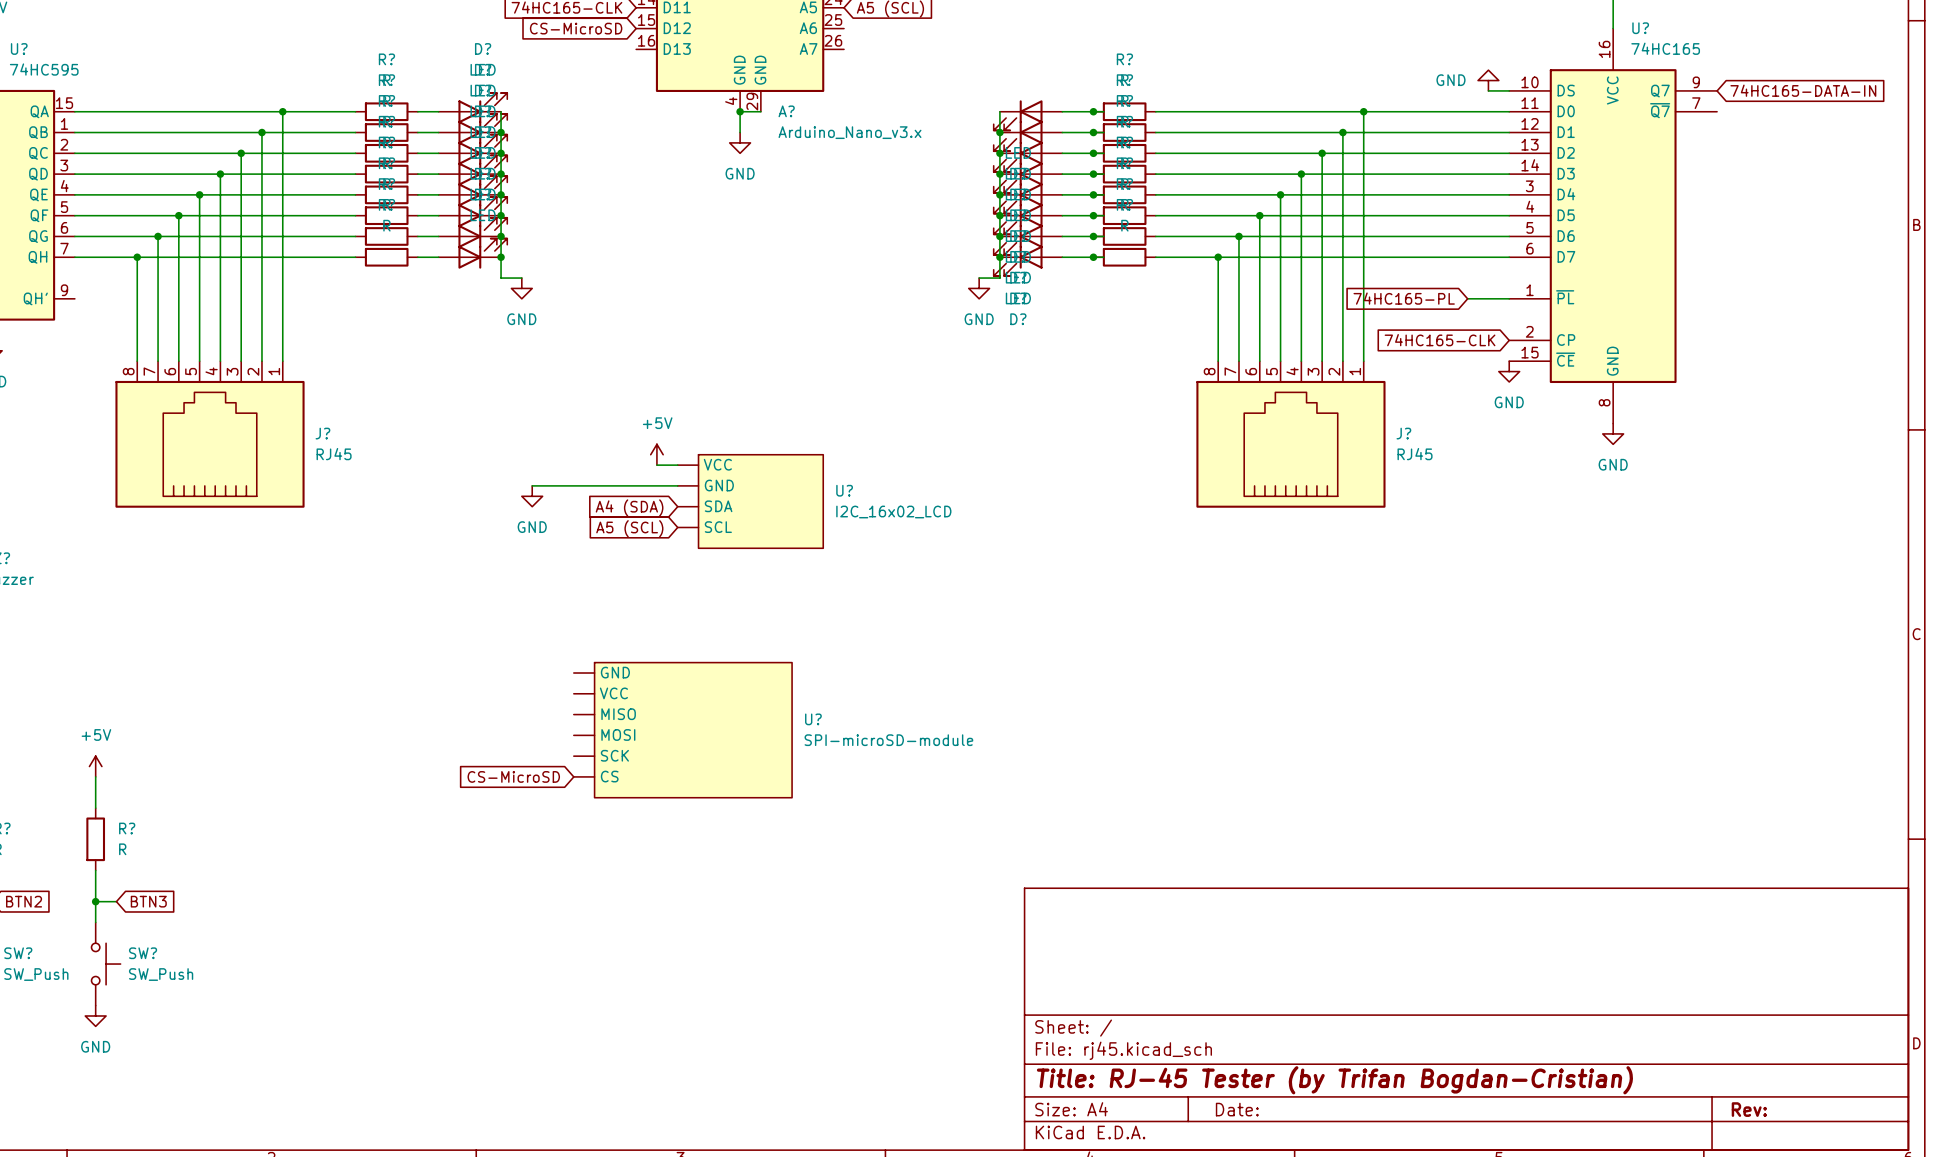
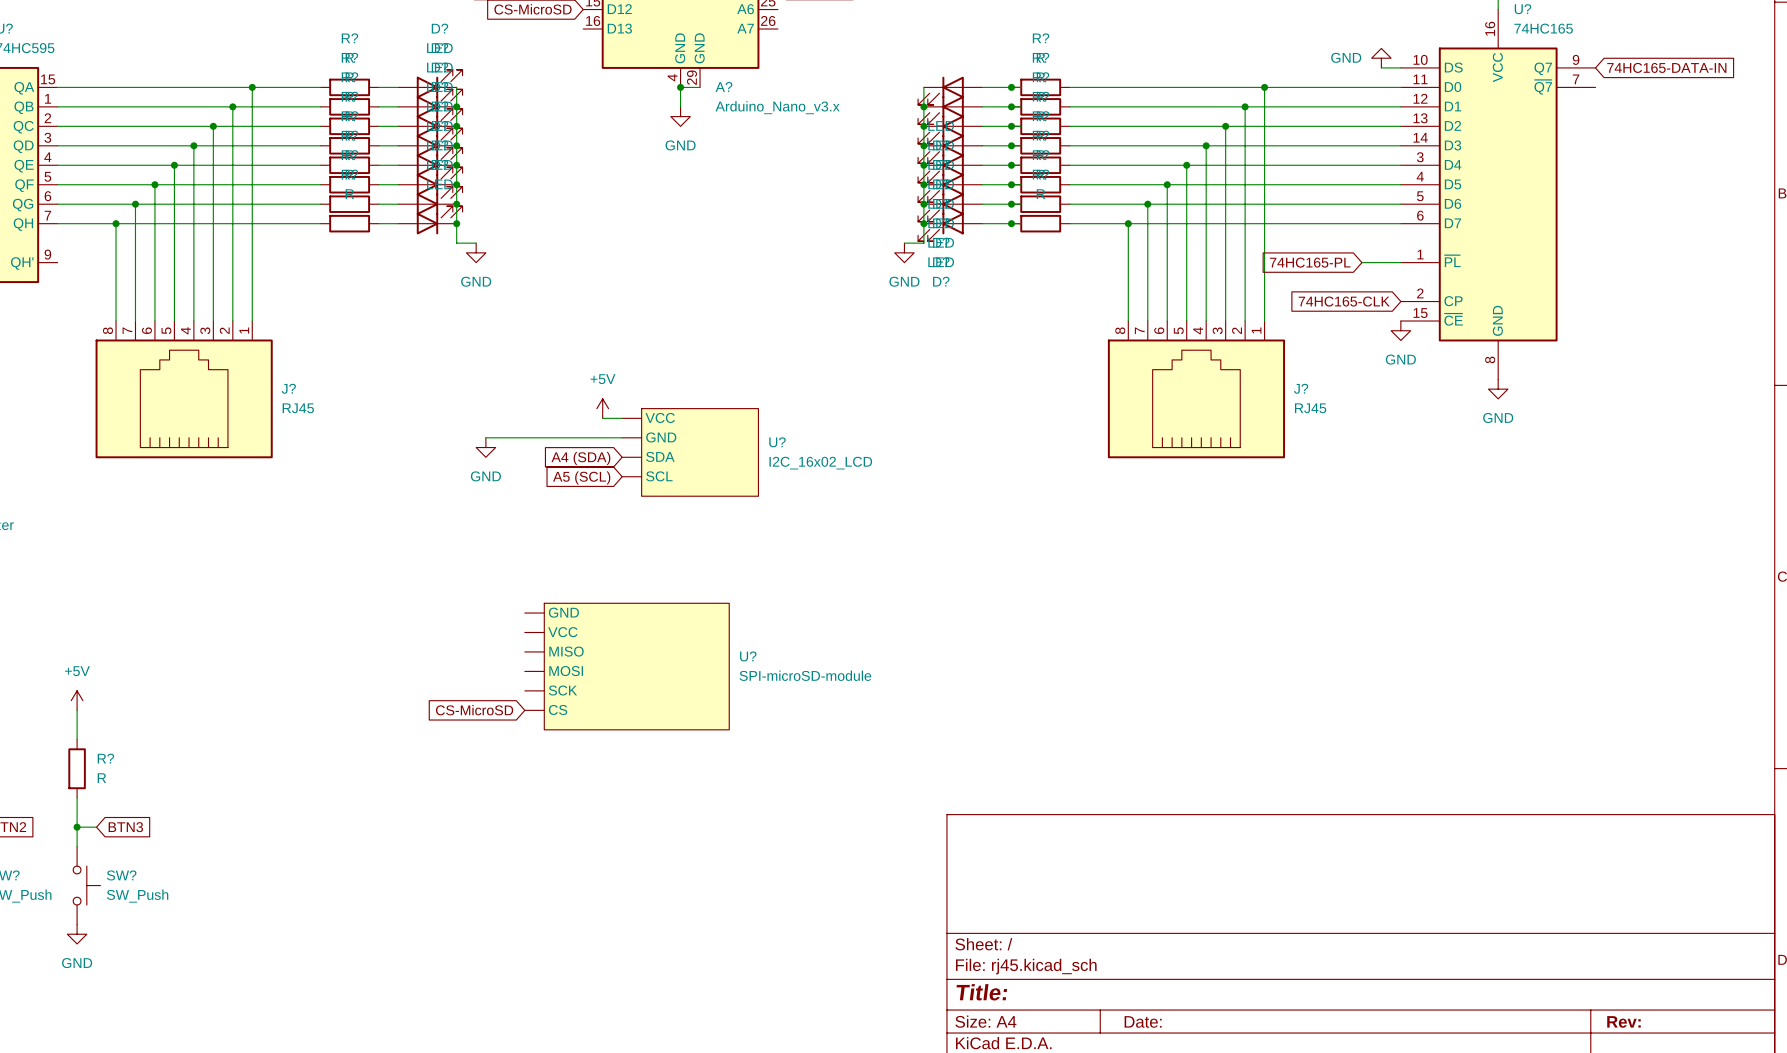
title block: Title: RJ-45 Tester (by Trifan Bogdan-Cristian) (1334, 1080) -> Title: (981, 992)

